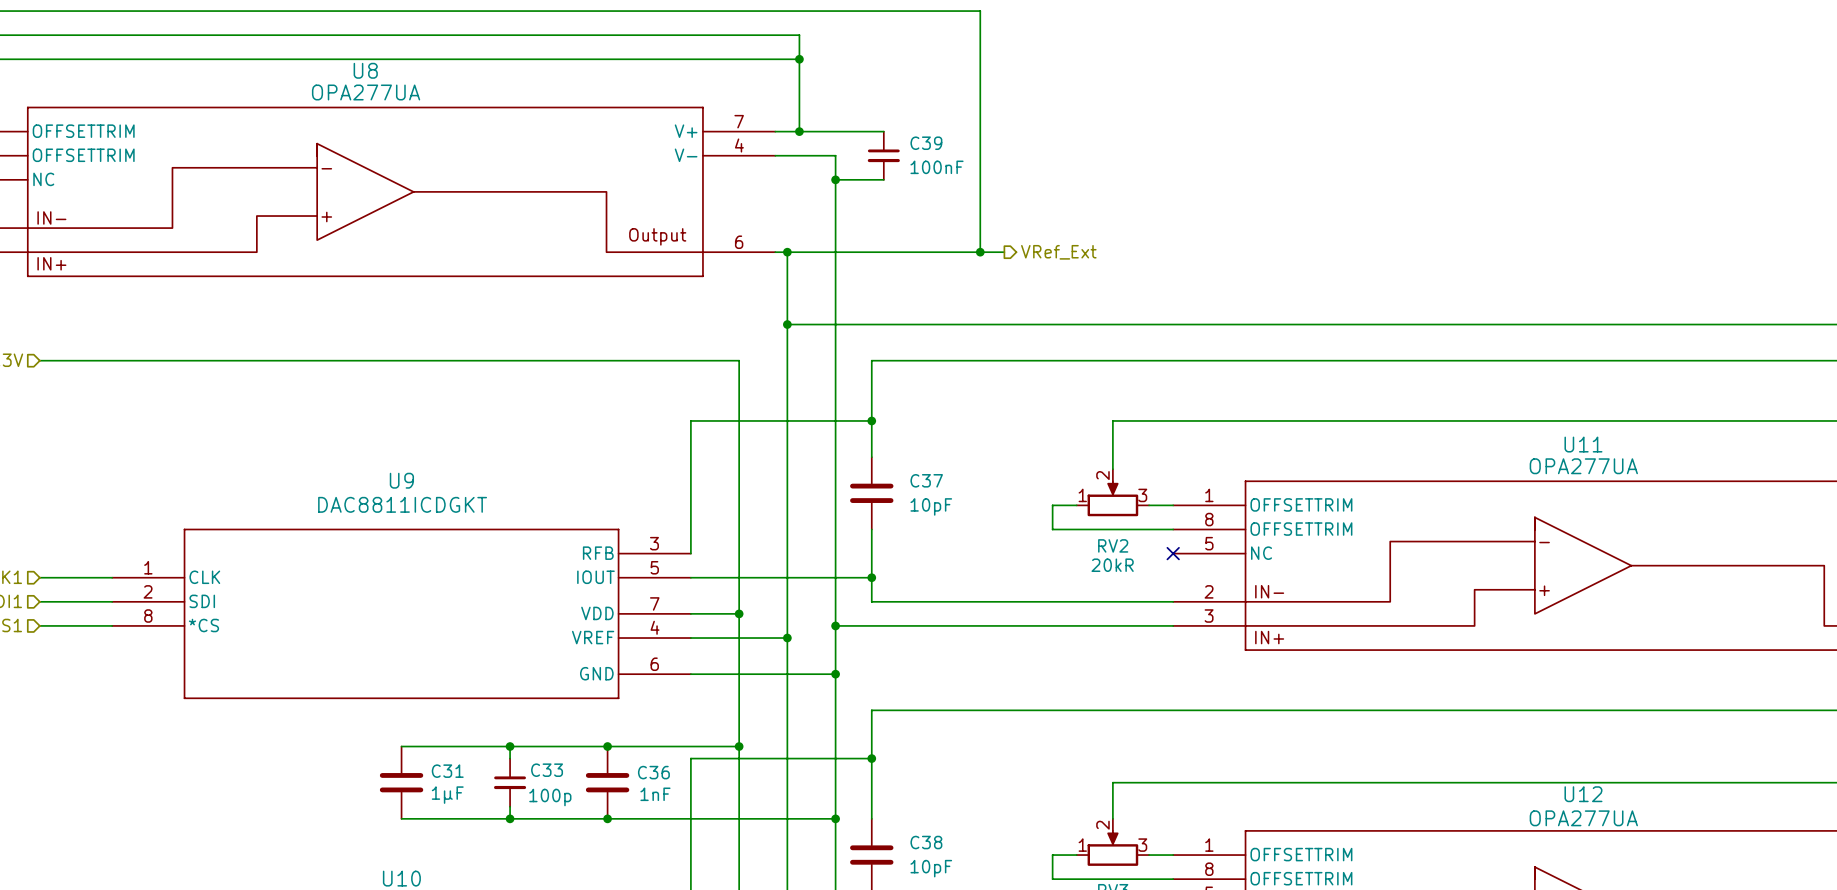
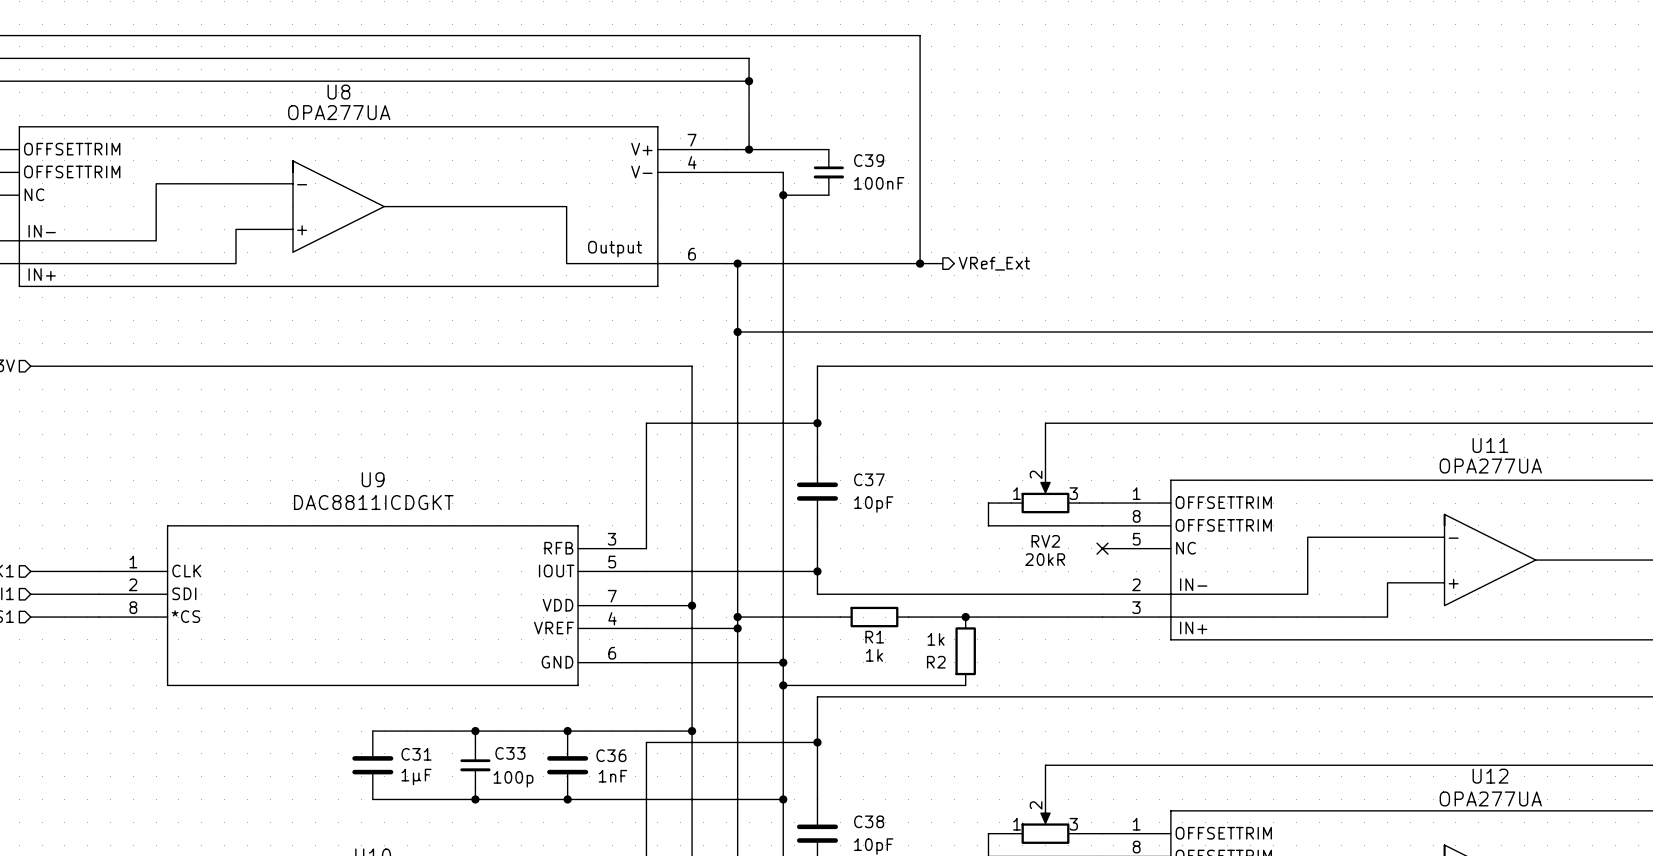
wire: none -> (737, 617) (783, 617)
junction: none -> (737, 617)
junction: (835, 625) -> none
wire: (895, 625) (968, 625) -> none
R1: none -> 1k (874, 617)
junction: none -> (965, 617)
R2: none -> 1k (965, 651)
wire: none -> (783, 685) (965, 685)
junction: none -> (783, 685)

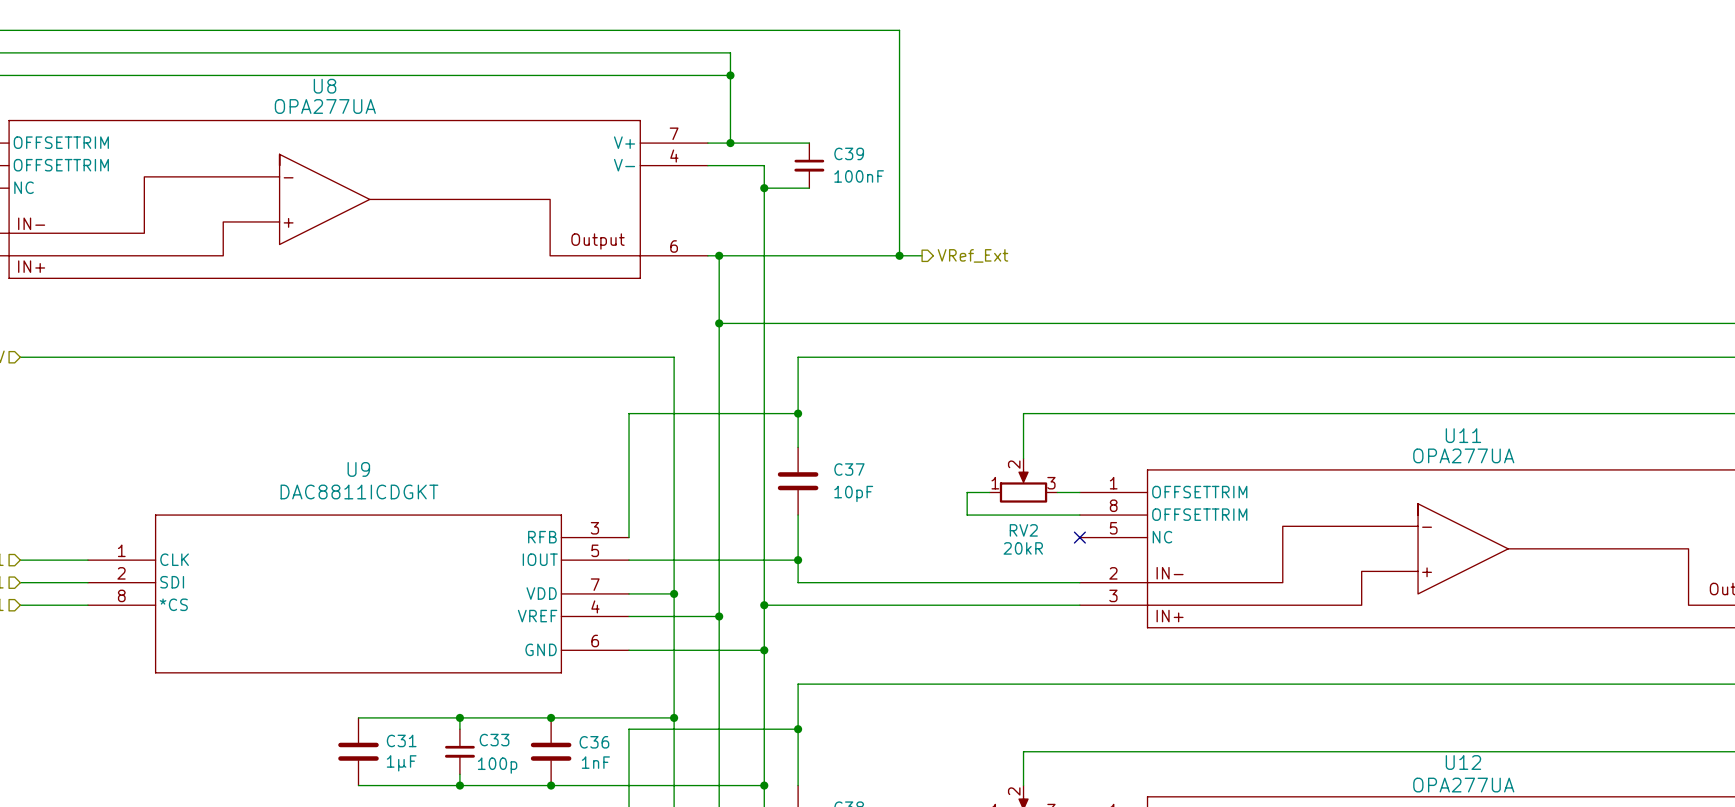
wire: (737, 617) (783, 617) -> none
junction: (737, 617) -> none
junction: none -> (764, 605)
wire: none -> (820, 605) (888, 605)
R1: 1k (874, 617) -> none
junction: (965, 617) -> none
R2: 1k (965, 651) -> none
wire: (783, 685) (965, 685) -> none
junction: (783, 685) -> none

